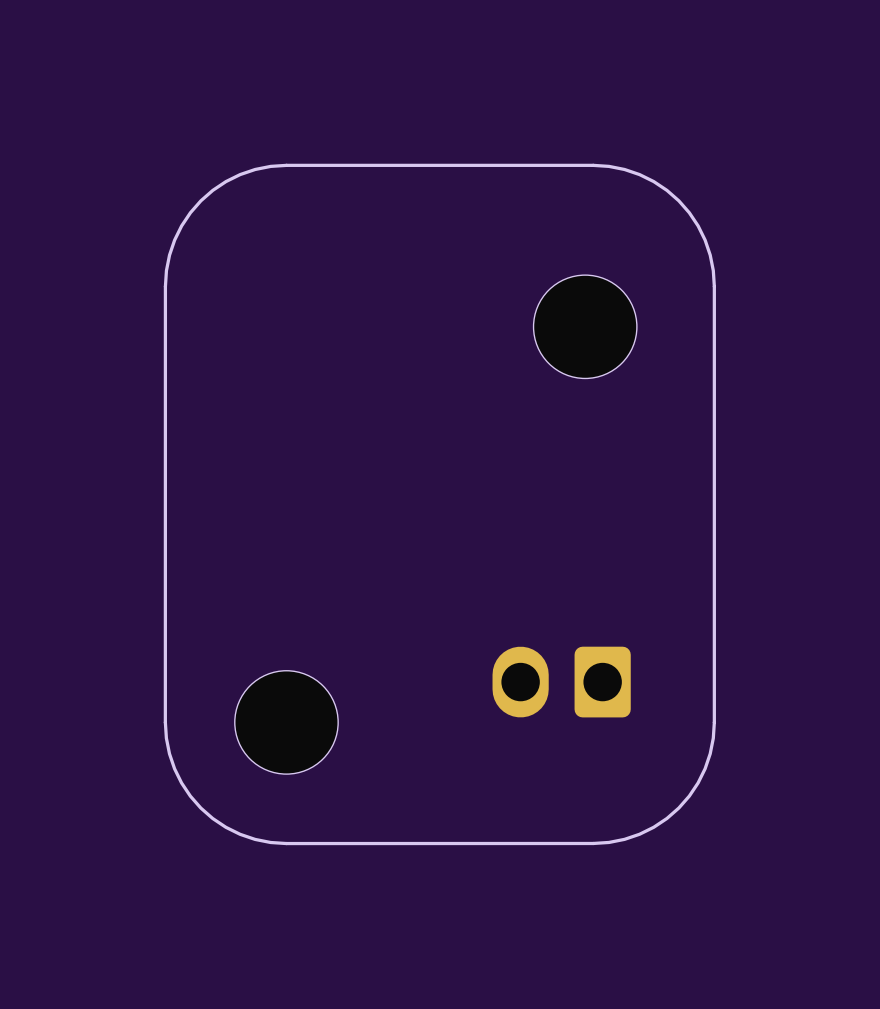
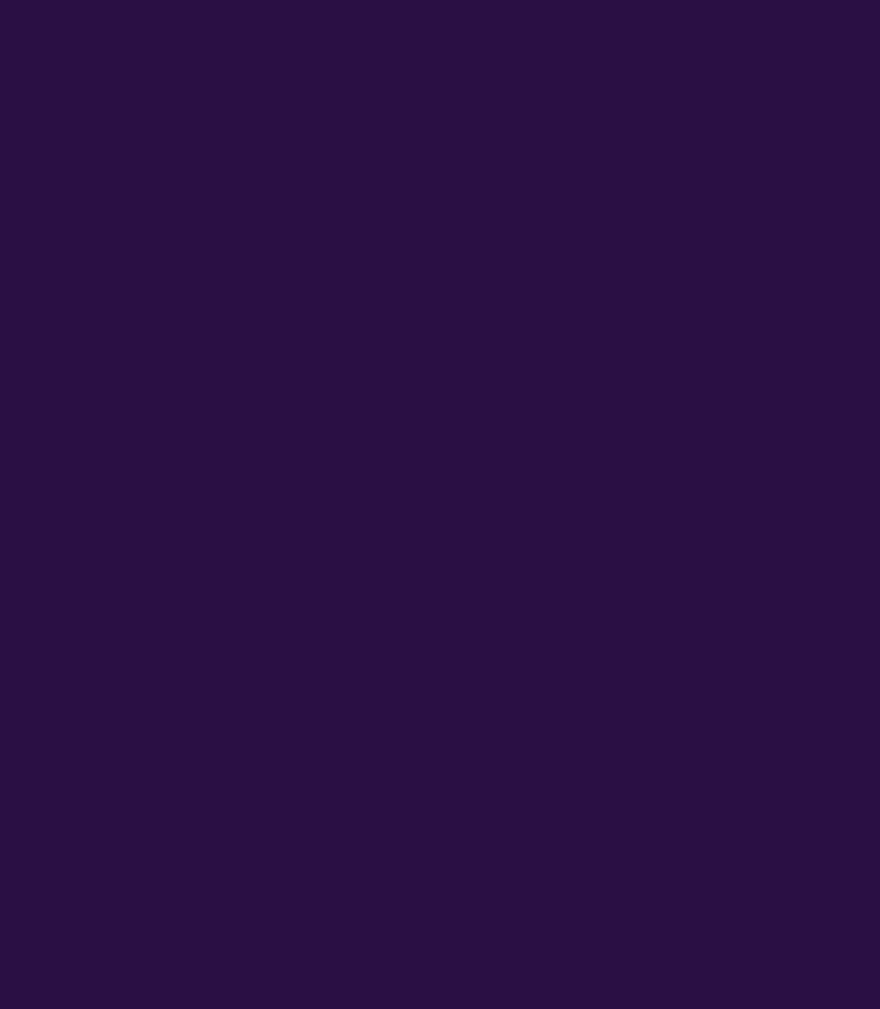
board edge: (593, 165) (270, 166) (240, 174) (212, 190) (190, 212) (181, 225) (169, 255) (165, 286) (166, 738) (169, 753) (181, 782) (200, 808) (225, 827) (255, 839) (286, 843) (609, 842) (639, 834) (653, 827) (678, 808) (698, 782) (710, 753) (714, 722) (713, 270) (705, 240) (689, 212) (678, 200) (666, 190) (639, 174) (624, 169) (593, 165) -> none
part: (585, 326) -> none
part: (561, 682) -> none
part: (286, 722) -> none

